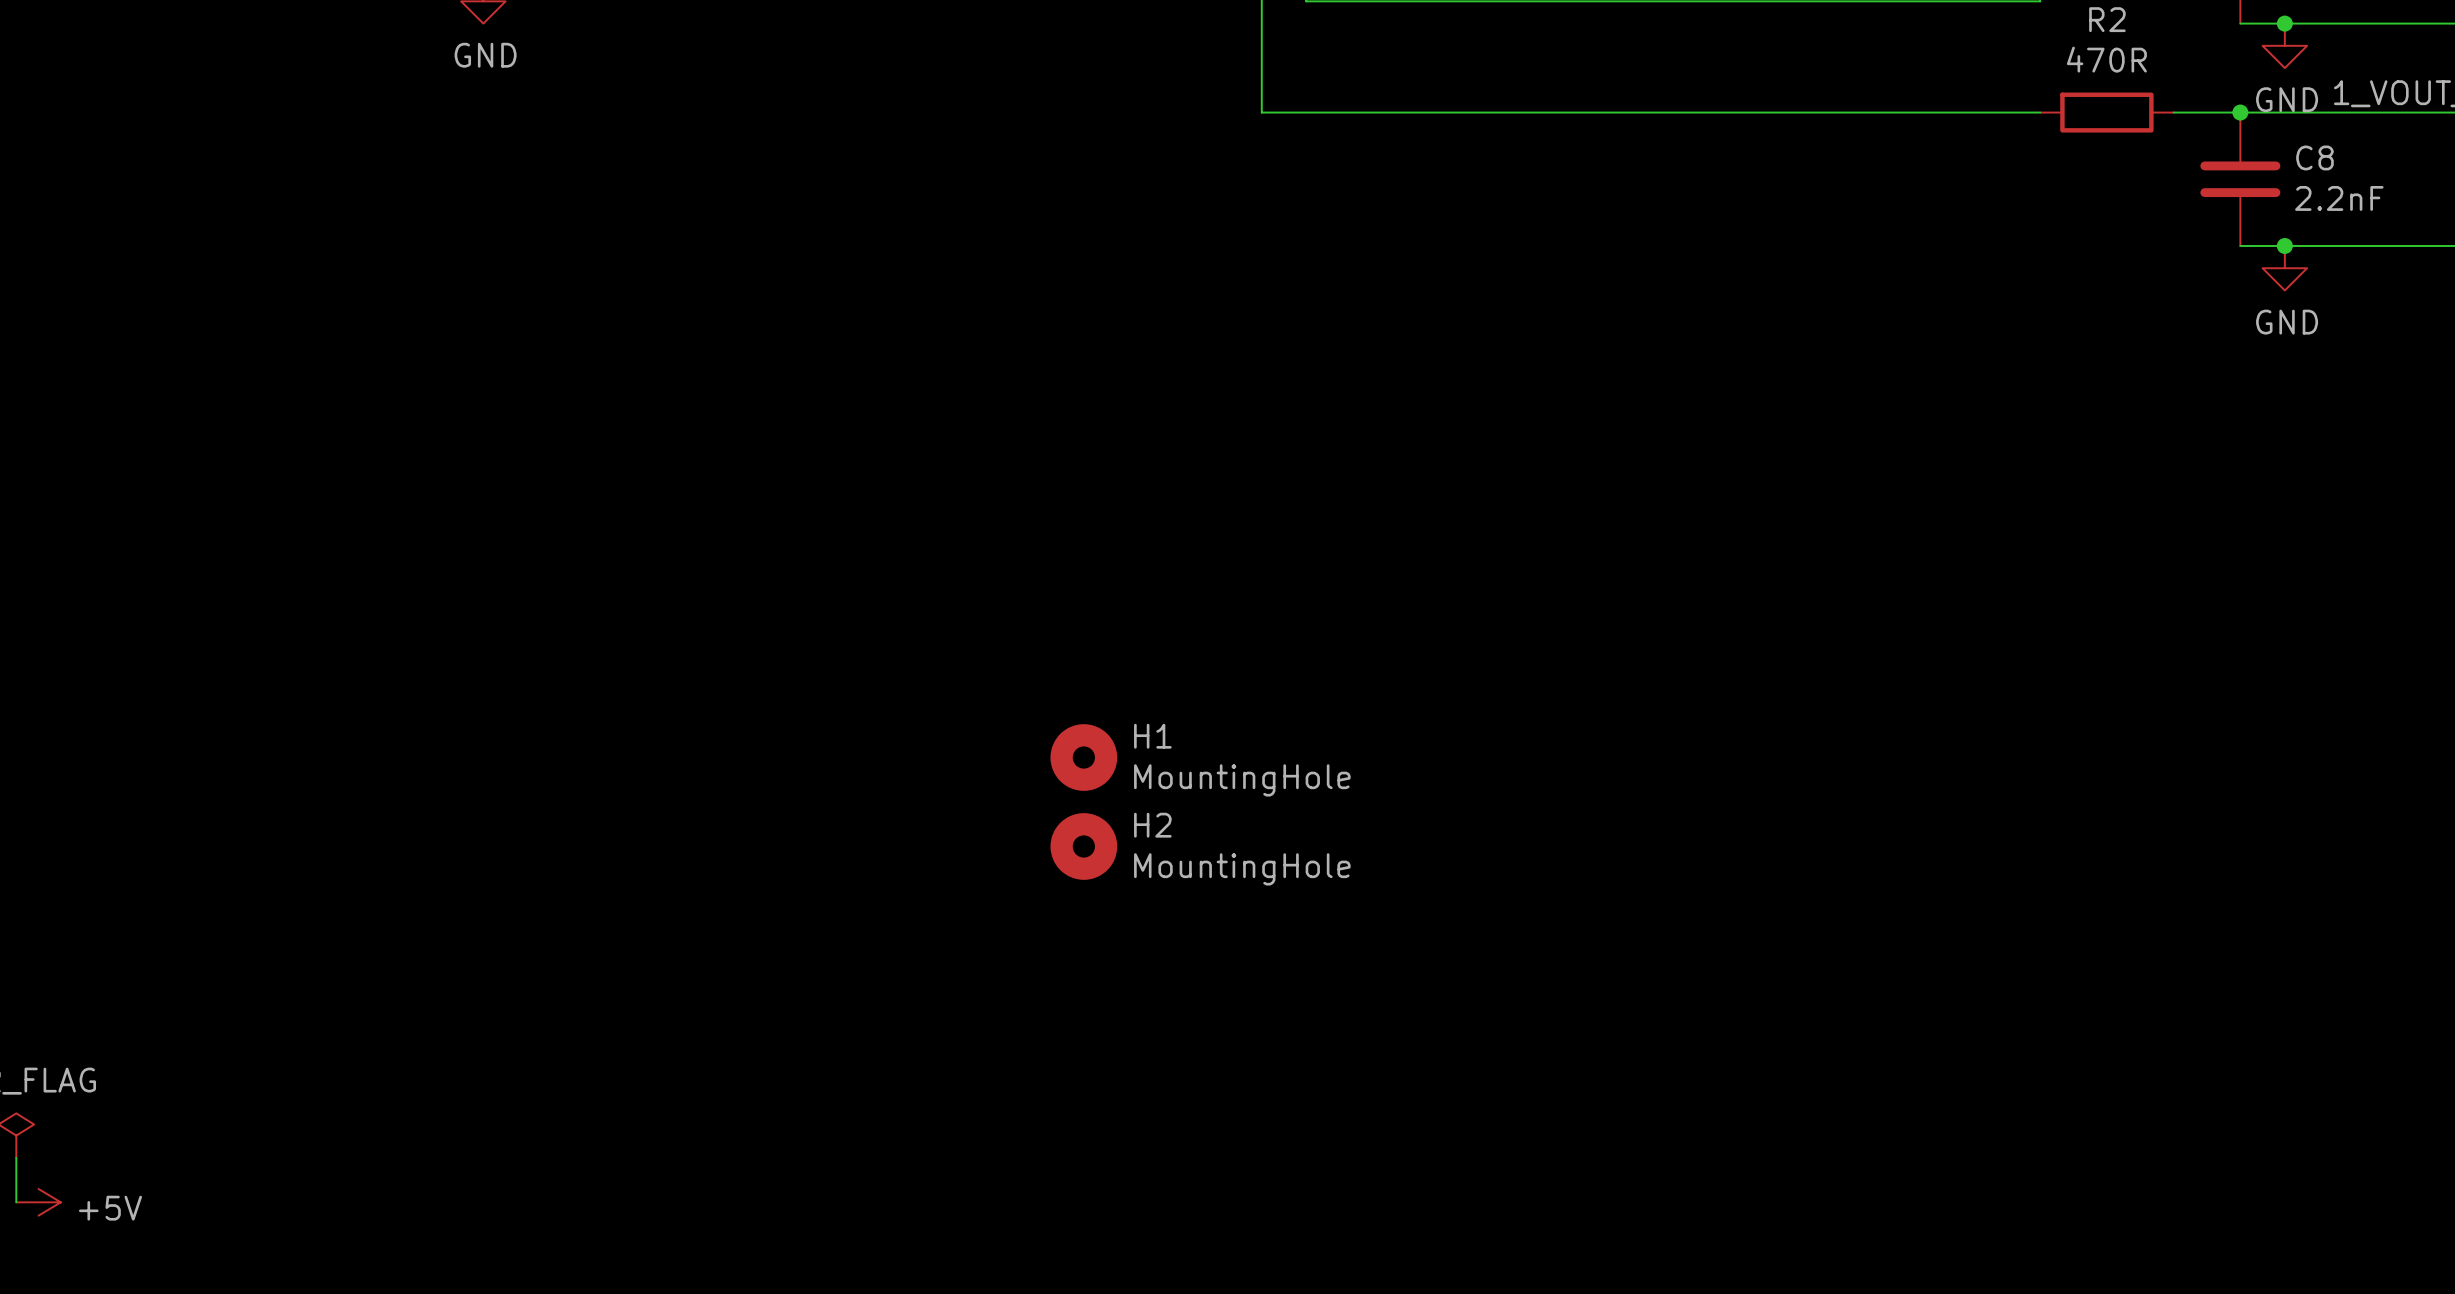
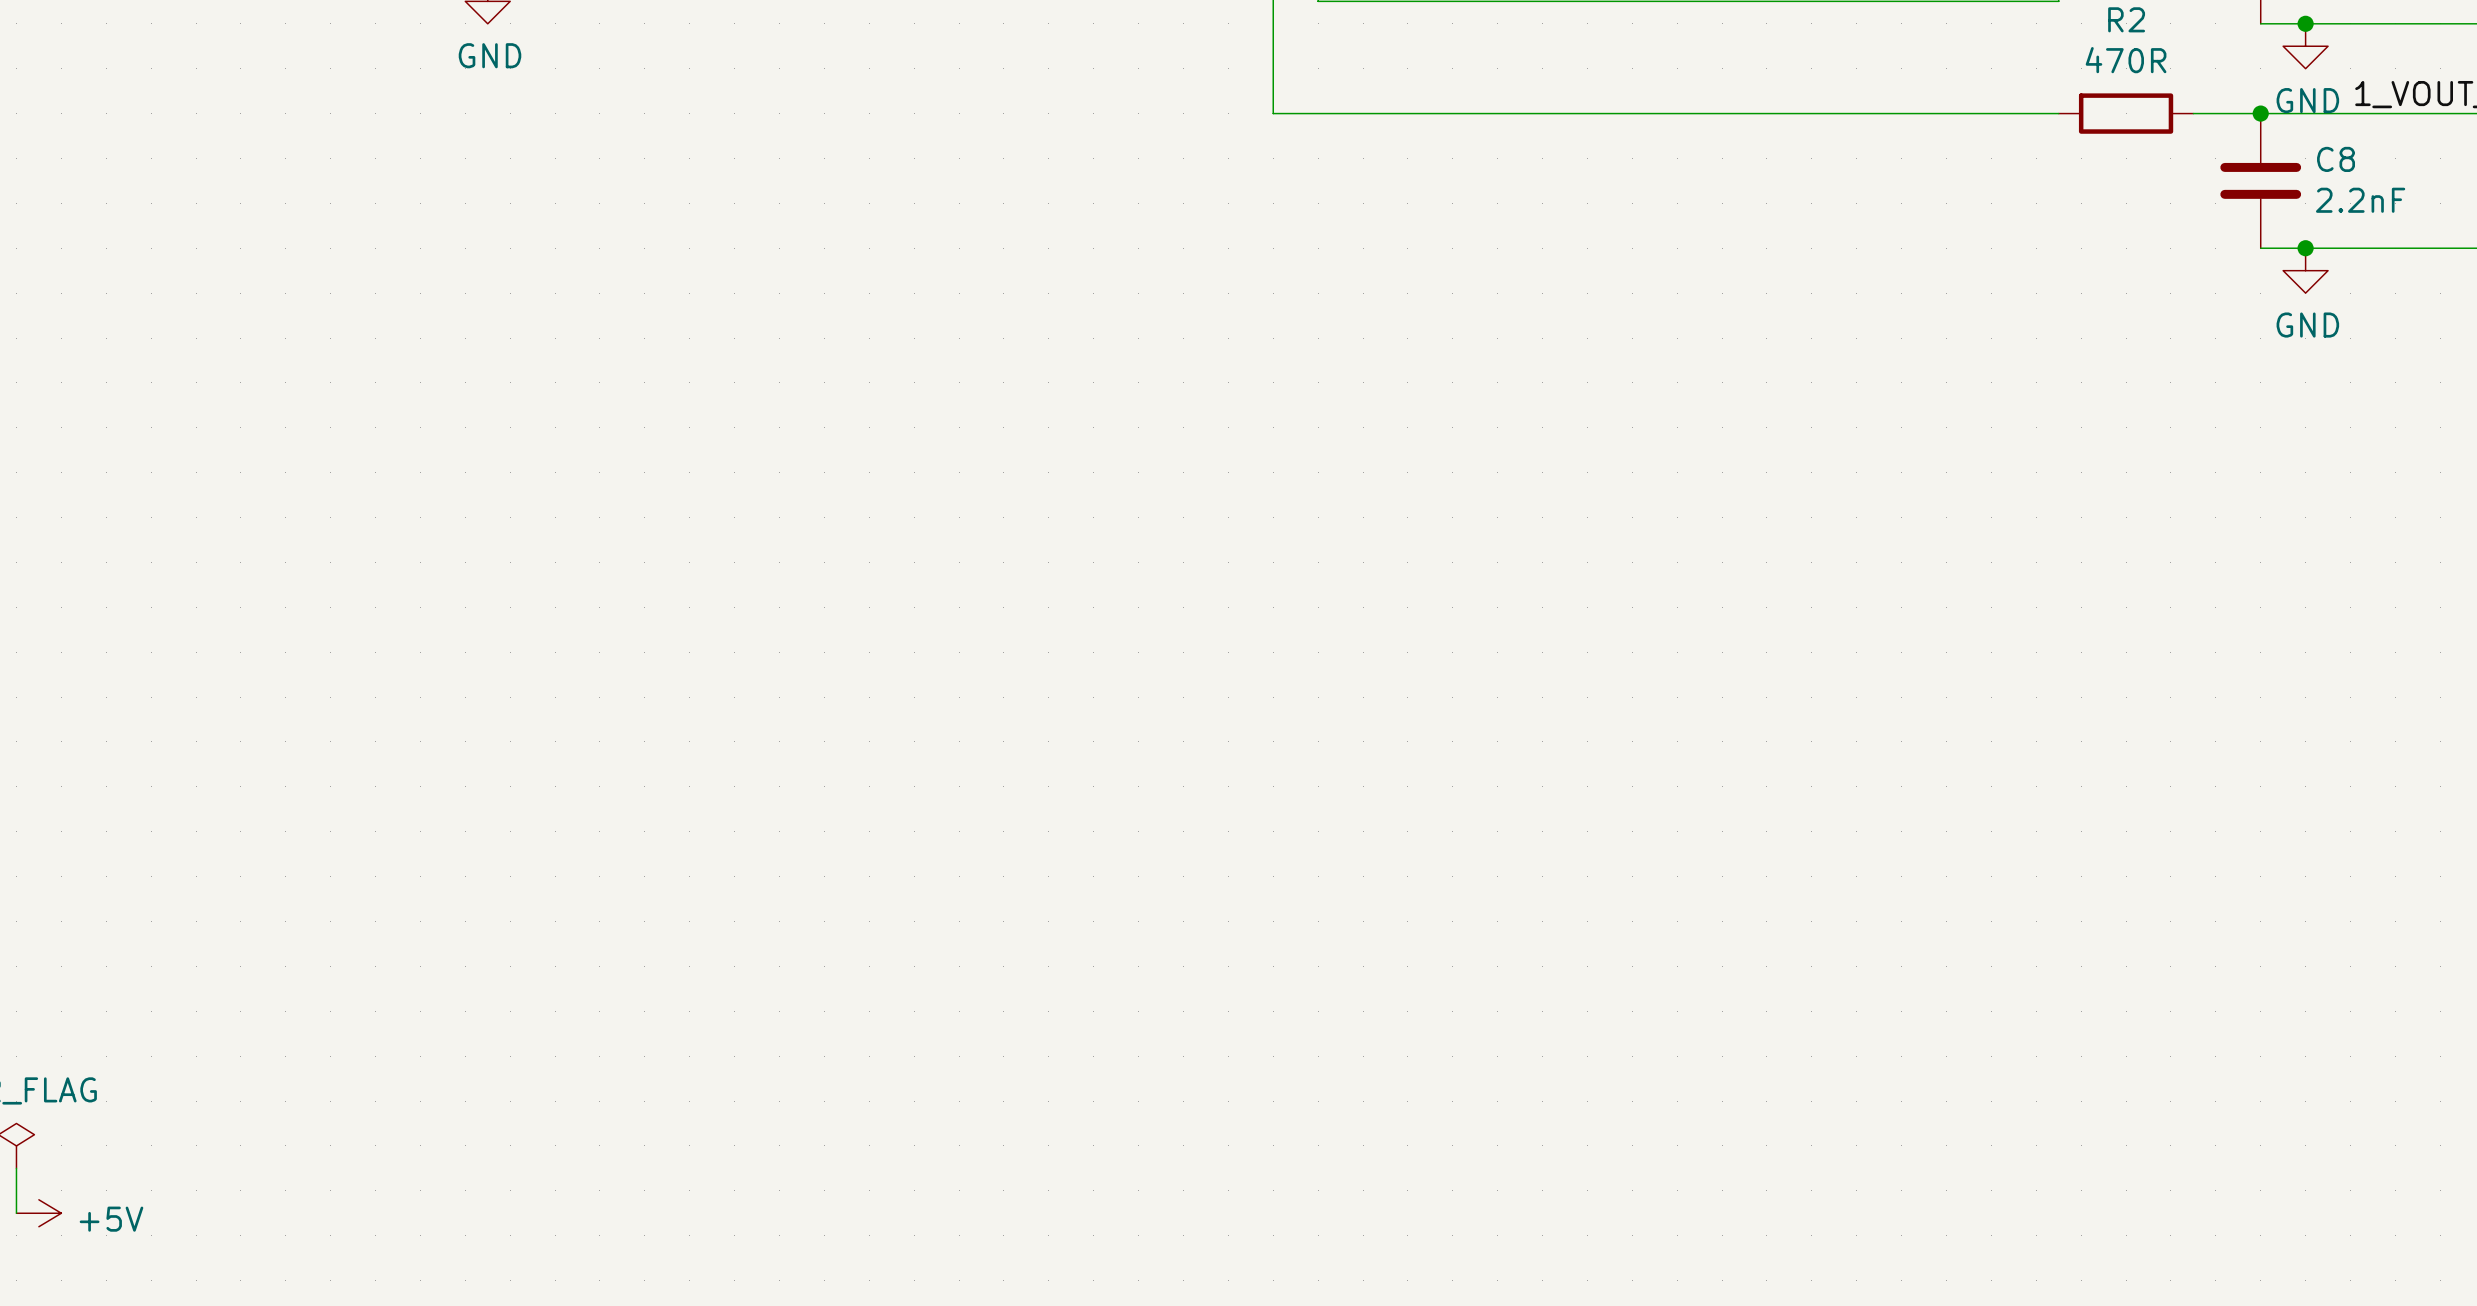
H1: MountingHole (1083, 757) -> none
H2: MountingHole (1083, 846) -> none

